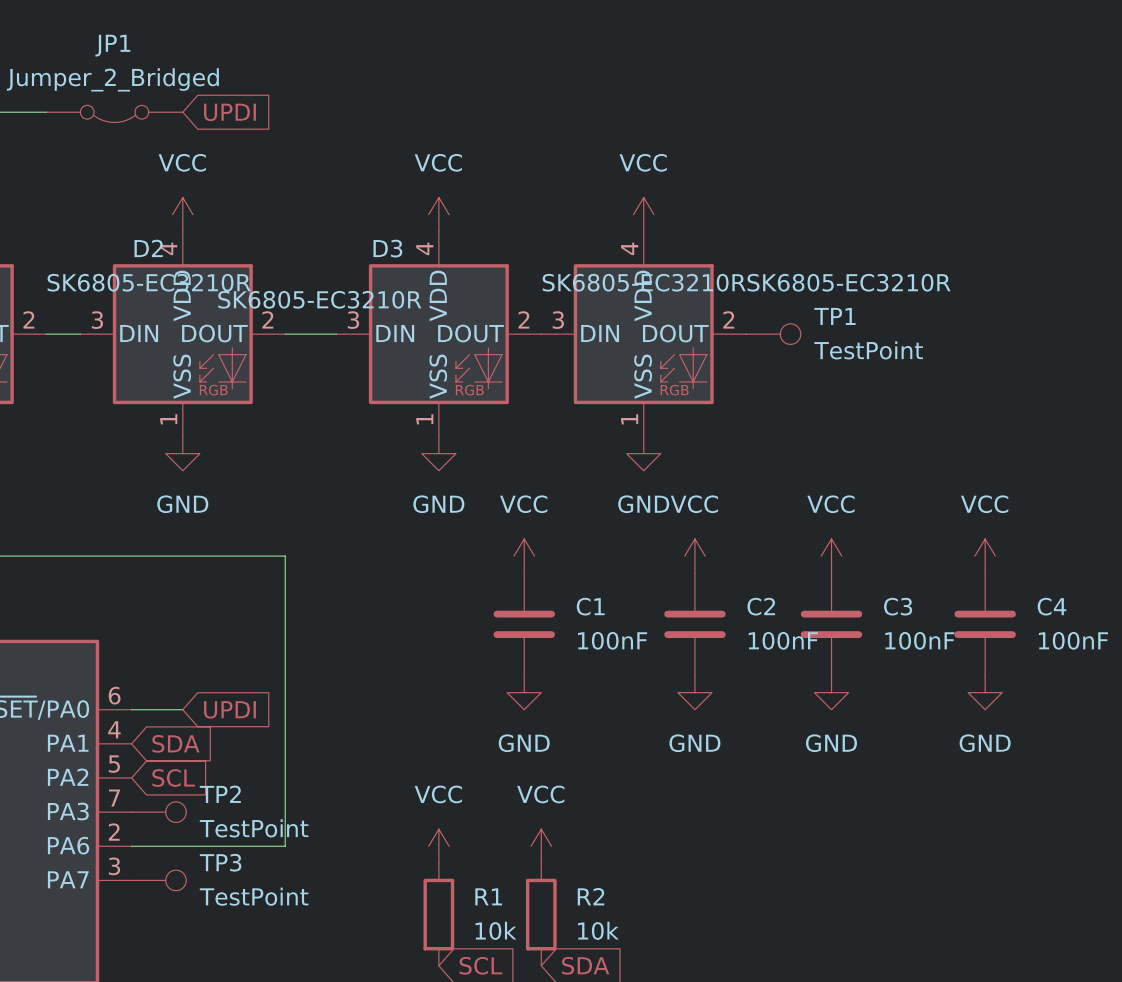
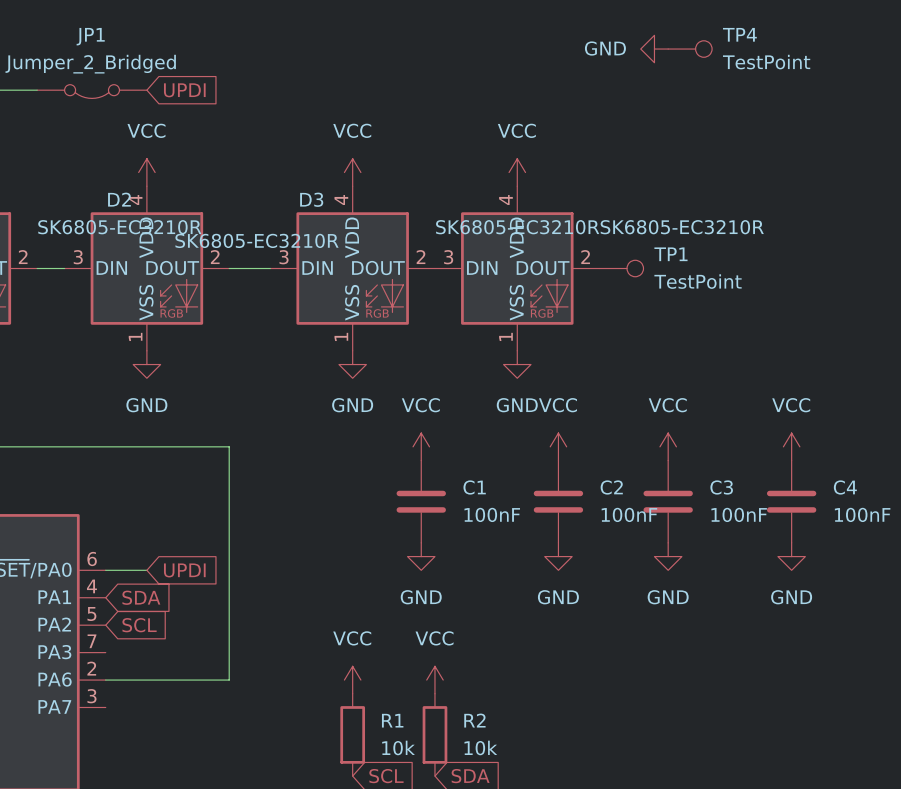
power symbol: none -> GND (654, 49)
TP4: none -> TestPoint (690, 49)
TP2: TestPoint (158, 812) -> none
TP3: TestPoint (158, 880) -> none

